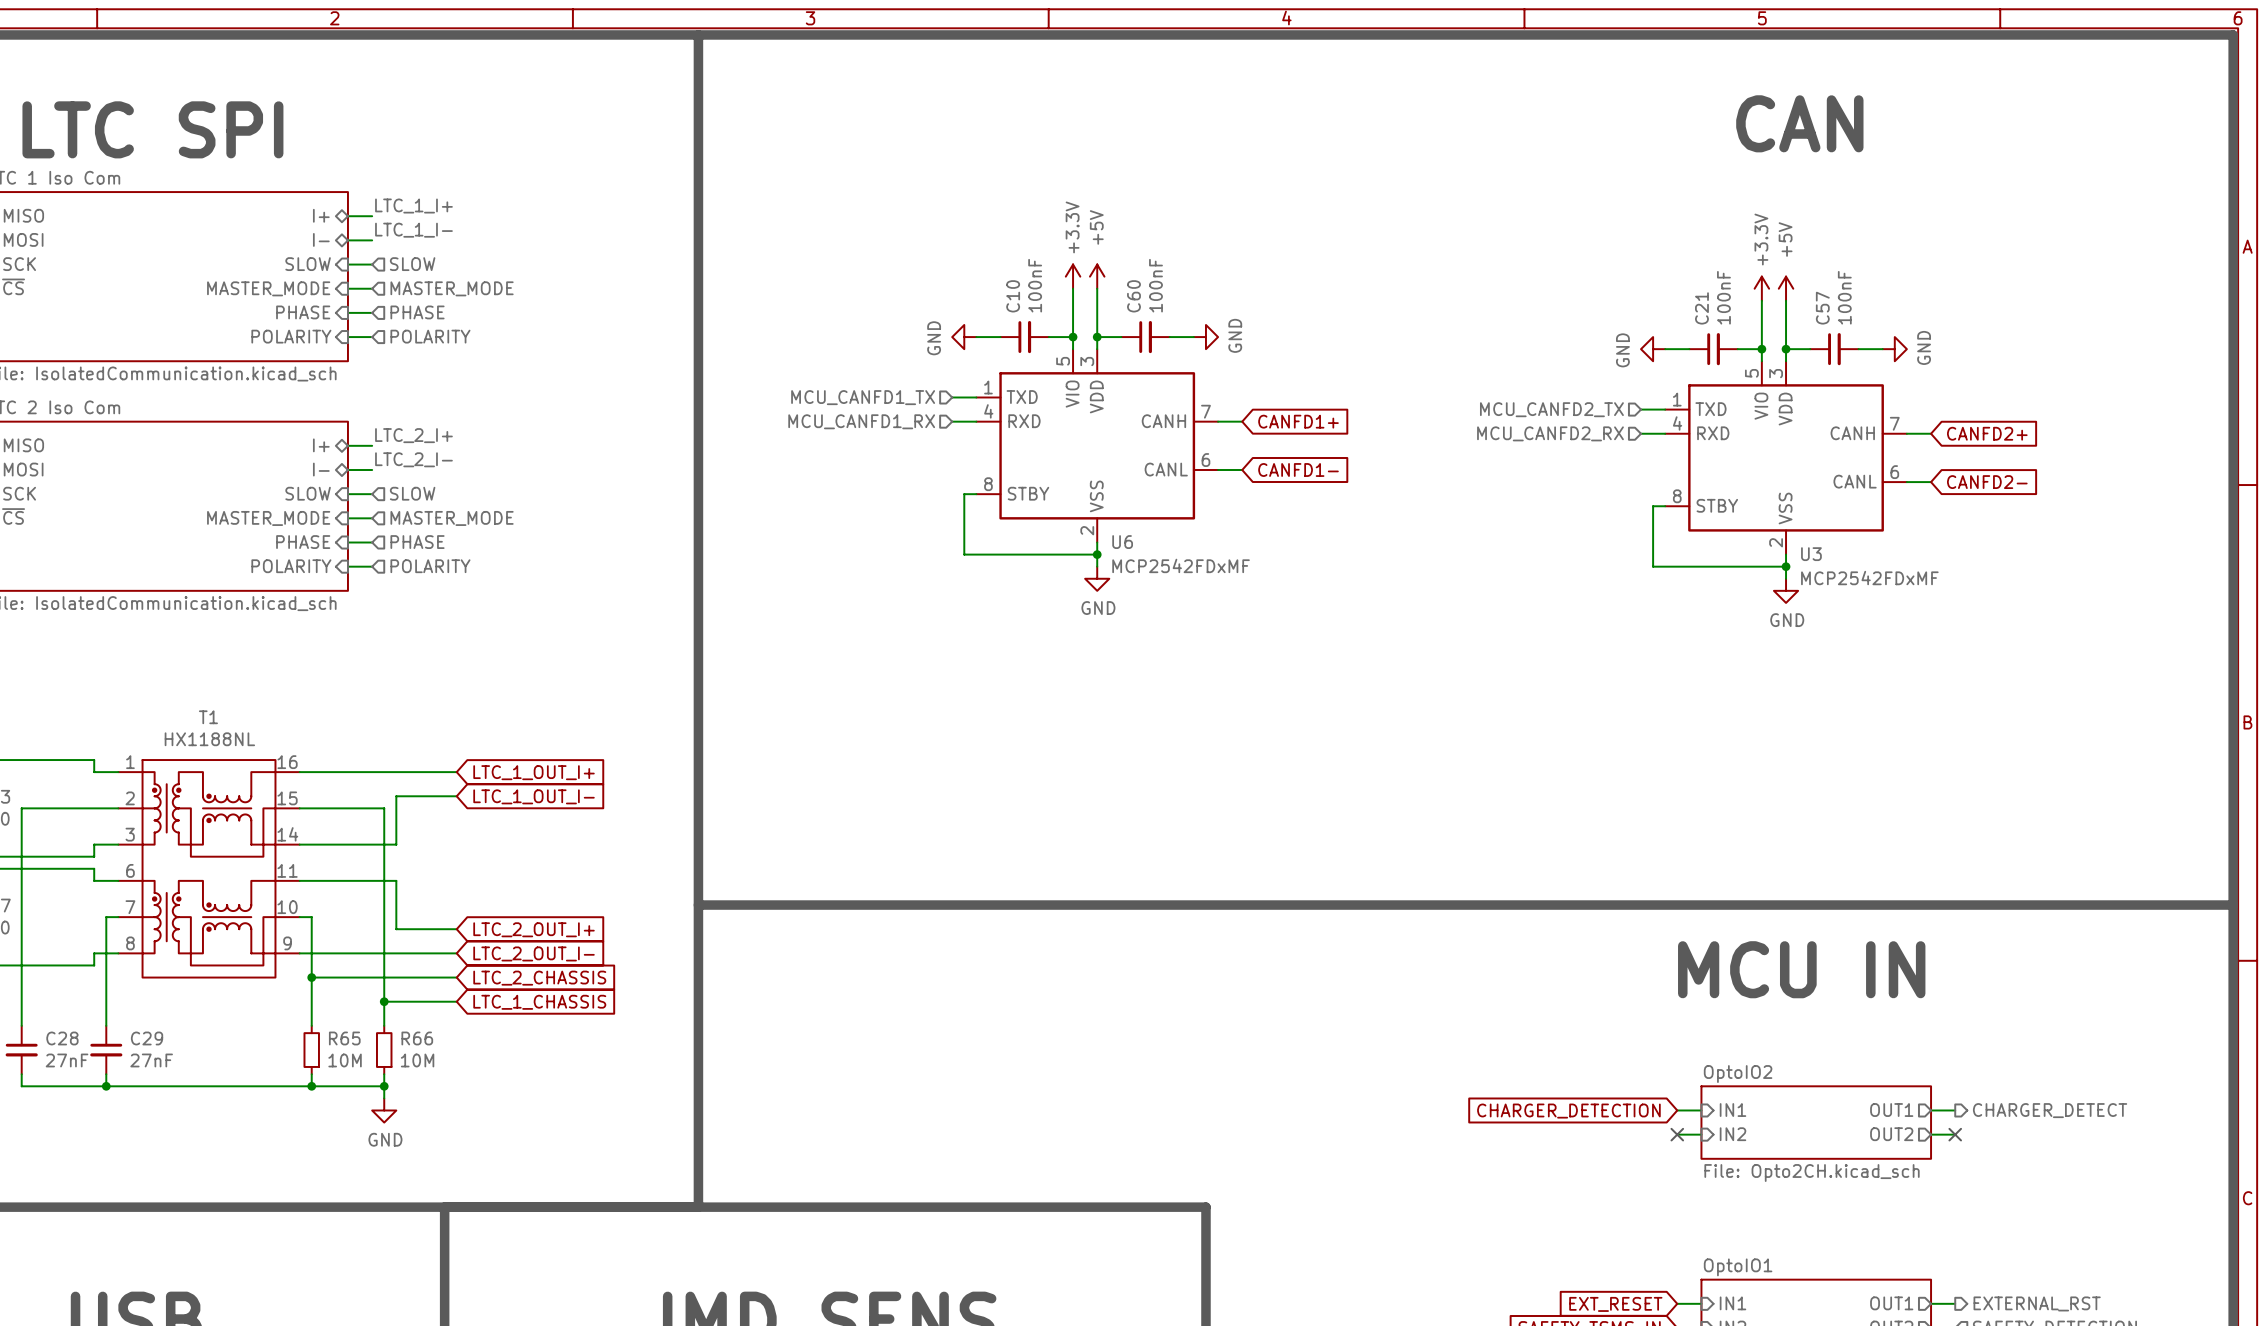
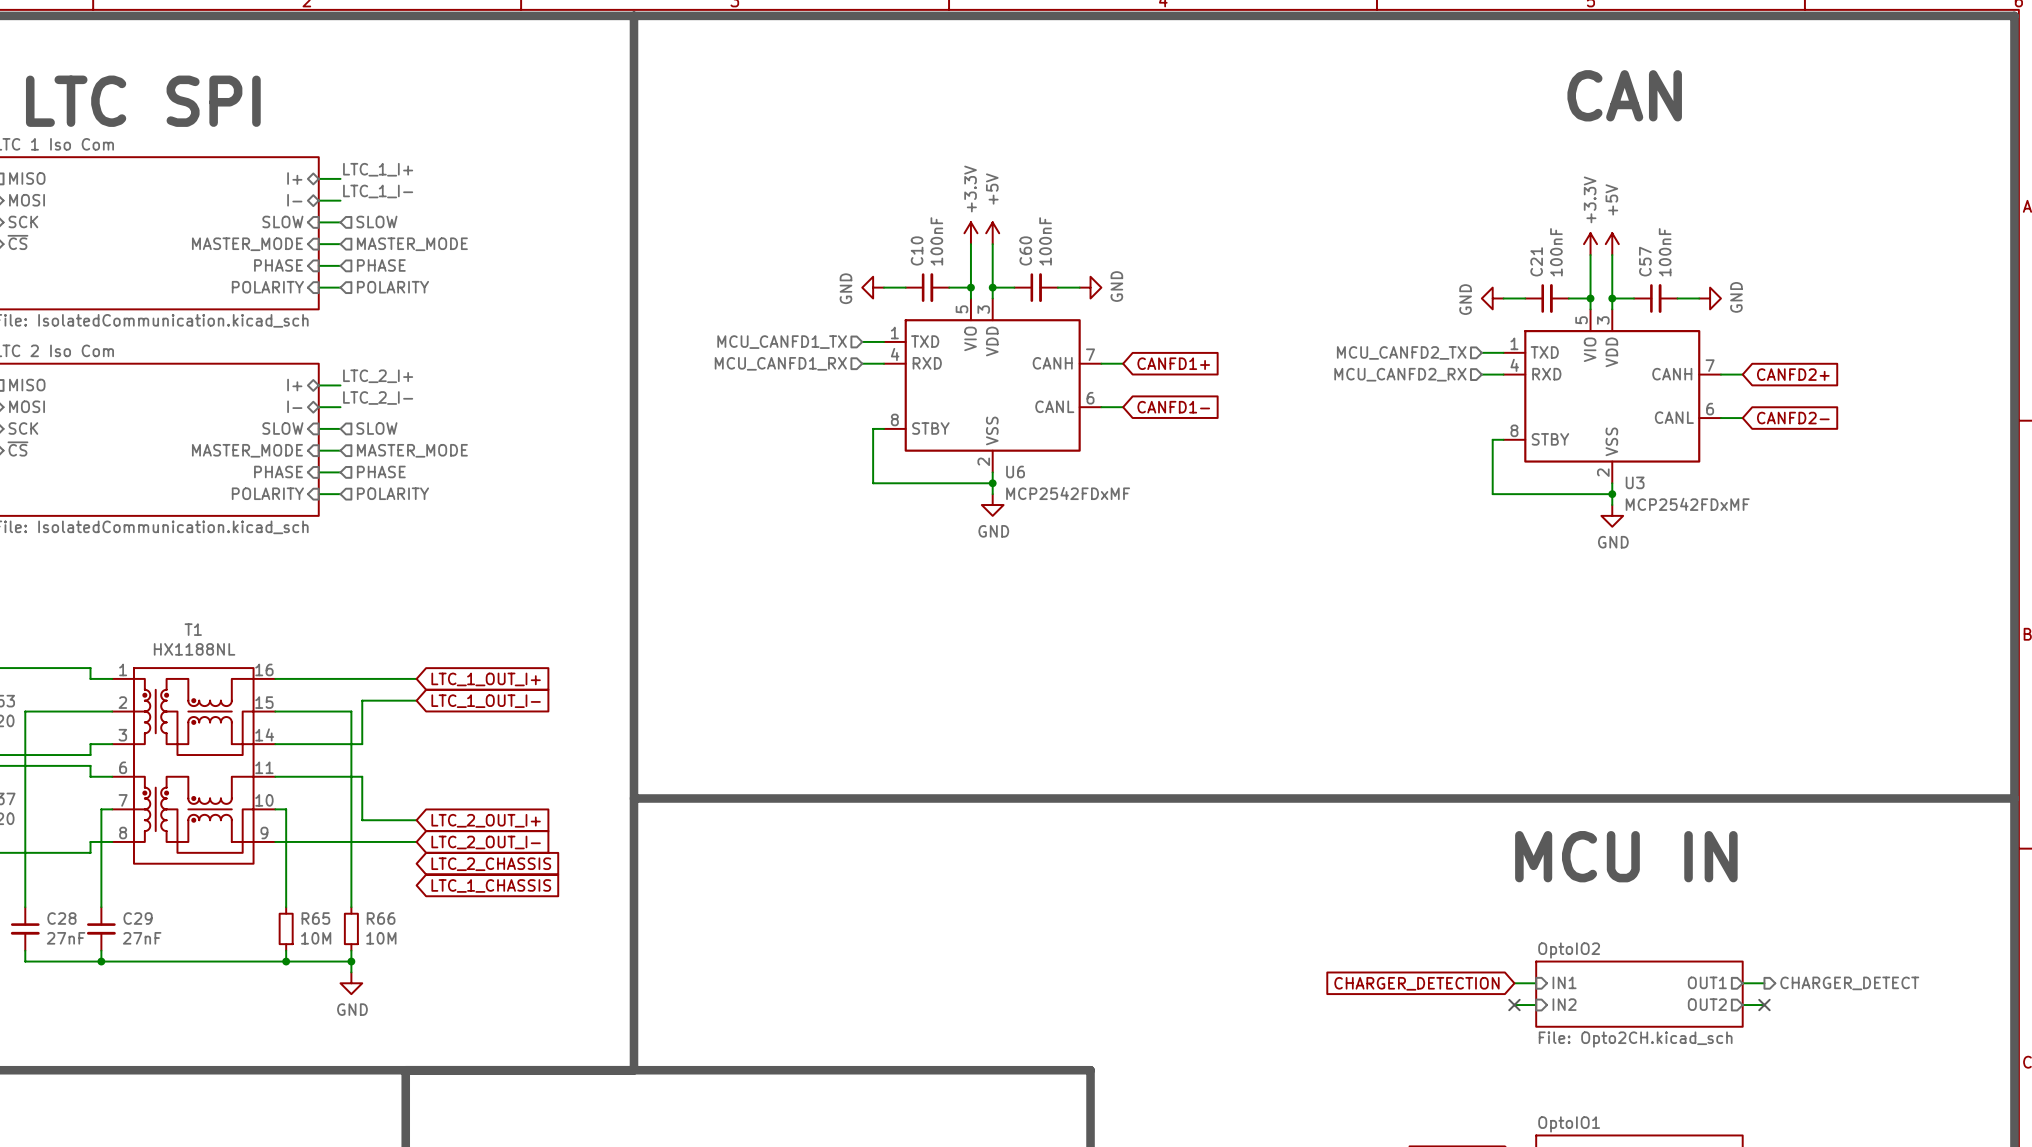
wire: (311, 977) (456, 977) -> none
junction: (311, 977) -> none
wire: (384, 1001) (456, 1001) -> none
junction: (384, 1001) -> none

